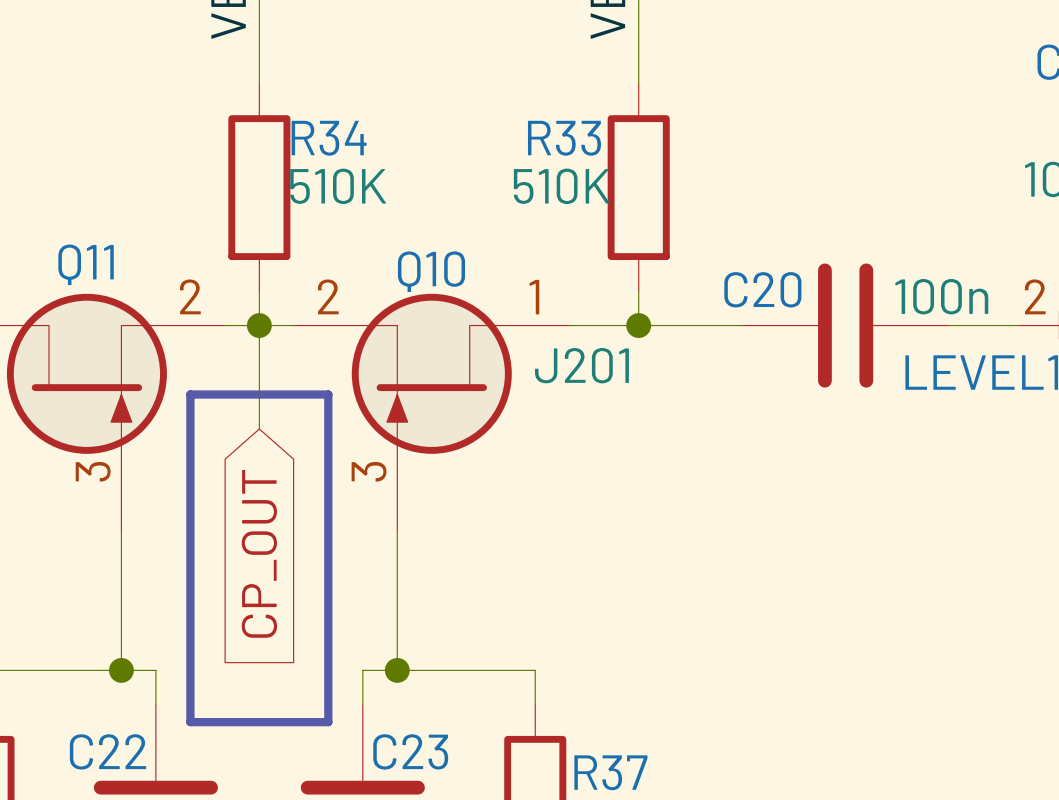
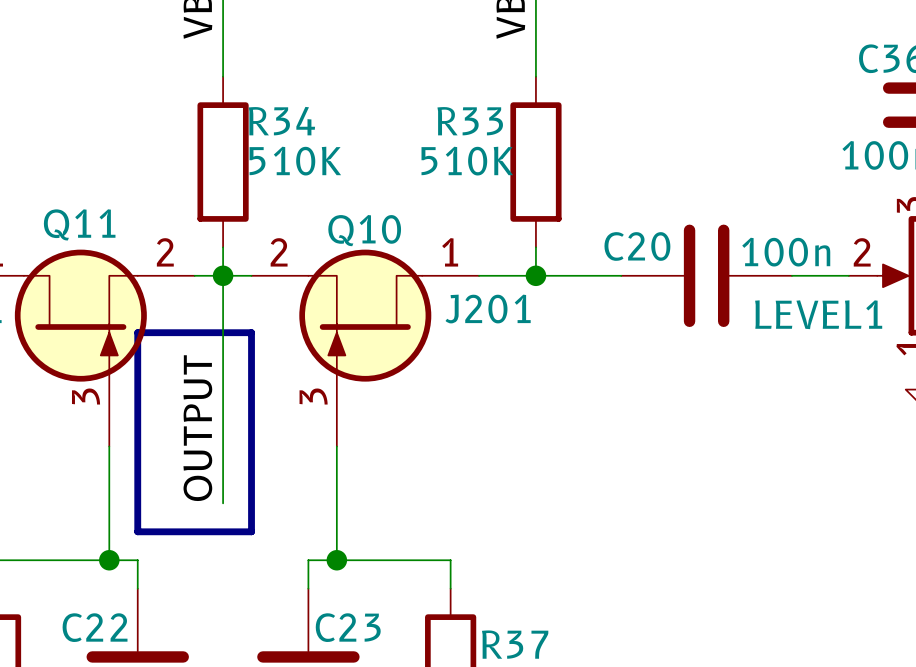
line: (190, 394) (190, 722) (328, 722) (328, 394) (293, 394) -> (166, 332) (137, 332) (137, 531) (251, 531) (251, 332)
wire: none -> (223, 361) (223, 503)
label: none -> OUTPUT (197, 428)
global label: CP_OUT (259, 553) -> none

